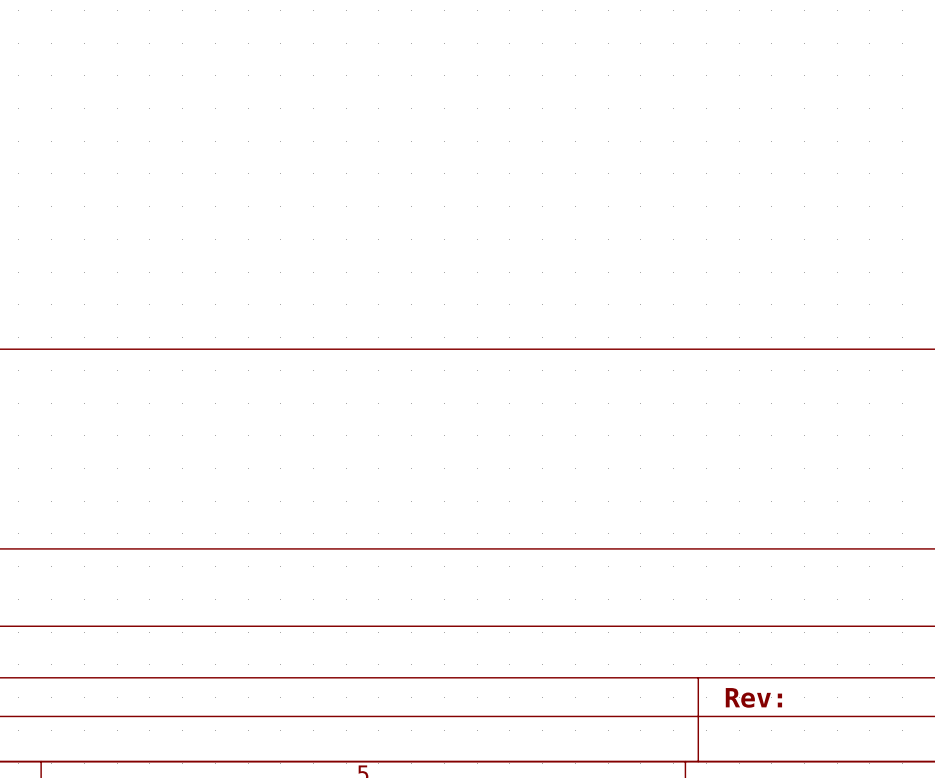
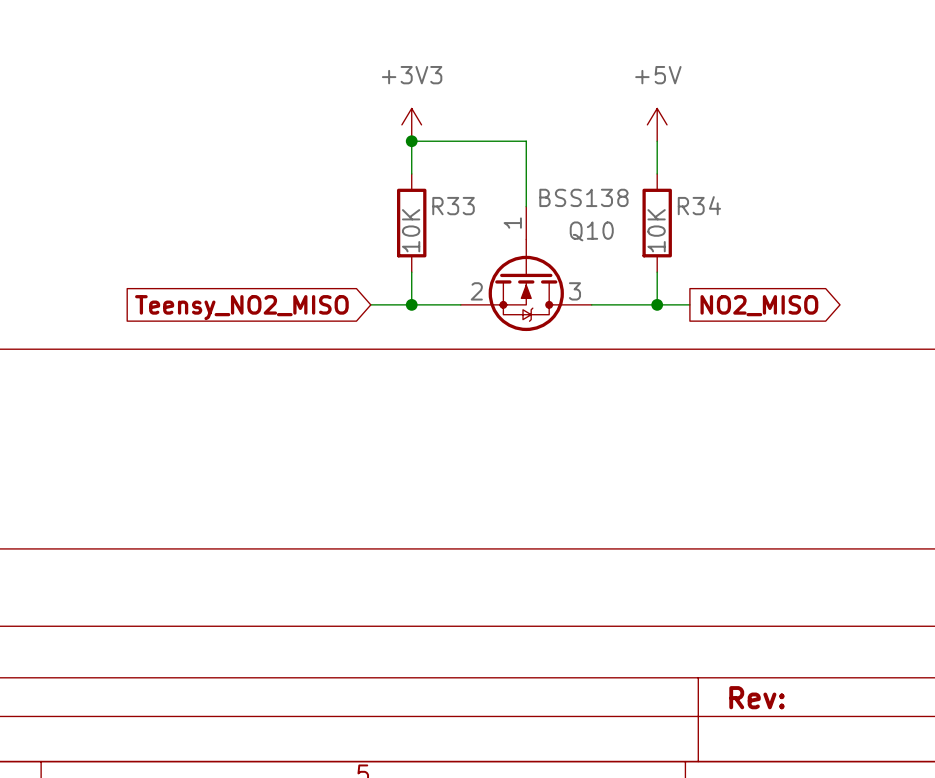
power symbol: none -> +3V3 (411, 124)
power symbol: none -> +5V (657, 124)
junction: none -> (411, 141)
wire: none -> (657, 141) (657, 173)
wire: none -> (411, 173) (411, 141) (526, 141) (526, 206)
R33: none -> 10K (411, 223)
R34: none -> 10K (657, 223)
Q10: none -> BSS138 (526, 268)
wire: none -> (411, 272) (411, 304)
wire: none -> (657, 272) (657, 304)
wire: none -> (370, 304) (460, 304)
junction: none -> (411, 304)
wire: none -> (591, 304) (689, 304)
junction: none -> (657, 304)
global label: none -> Teensy_NO2_MISO (241, 307)
global label: none -> NO2_MISO (759, 305)

